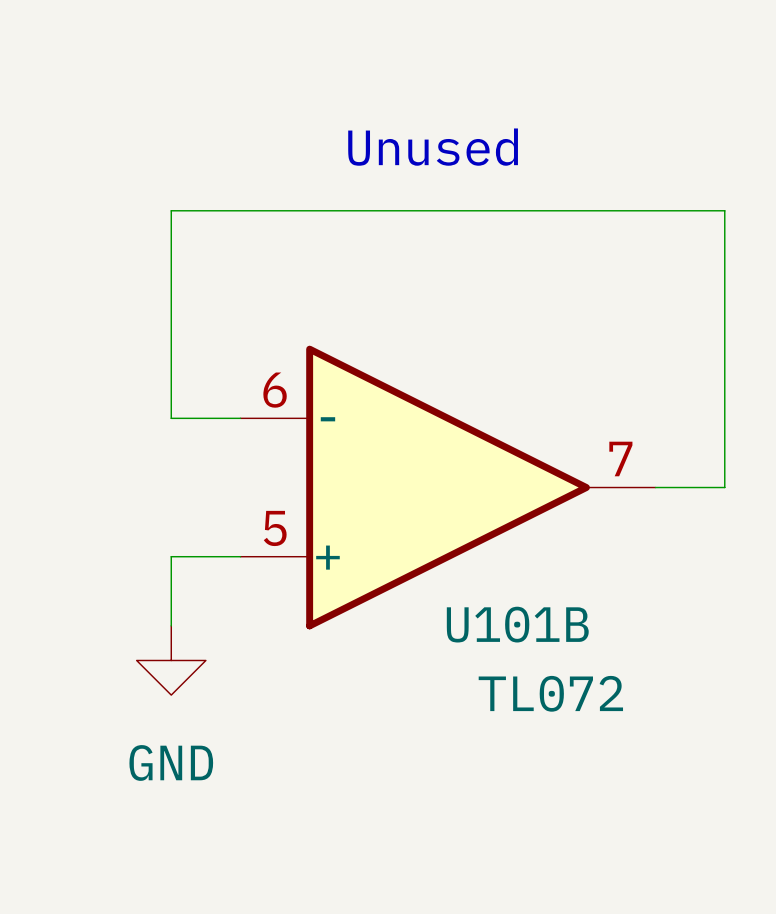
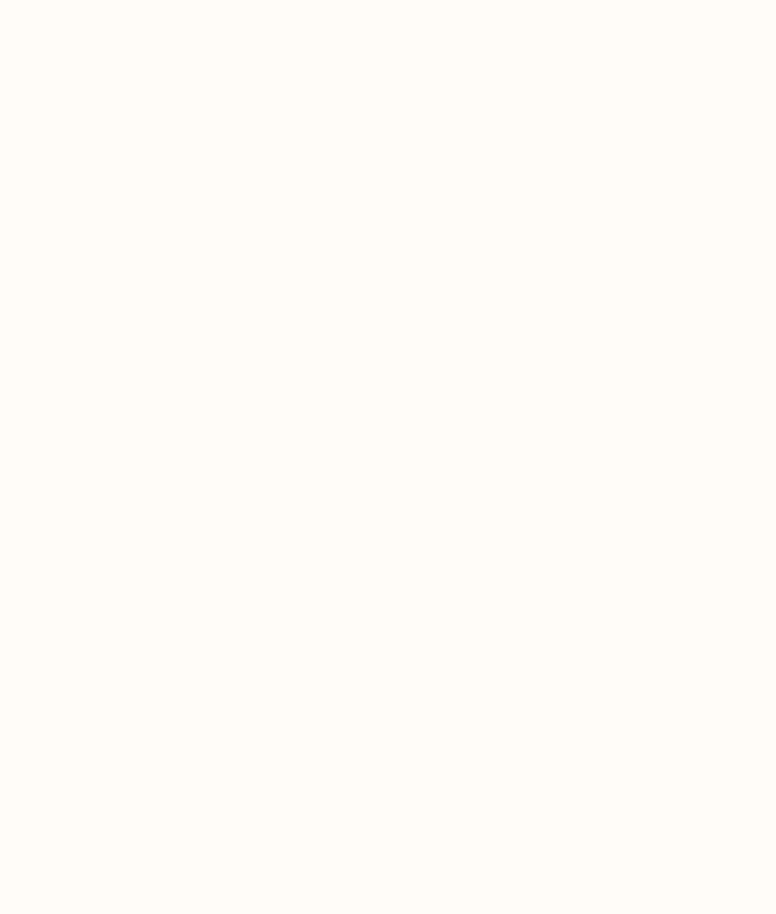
text: Unused (433, 147) -> none
wire: (240, 418) (171, 418) (171, 210) (724, 210) (724, 487) (655, 487) -> none
U101B: TL072 (448, 487) -> none
wire: (240, 556) (171, 556) (171, 625) -> none
power symbol: GND (171, 660) -> none

